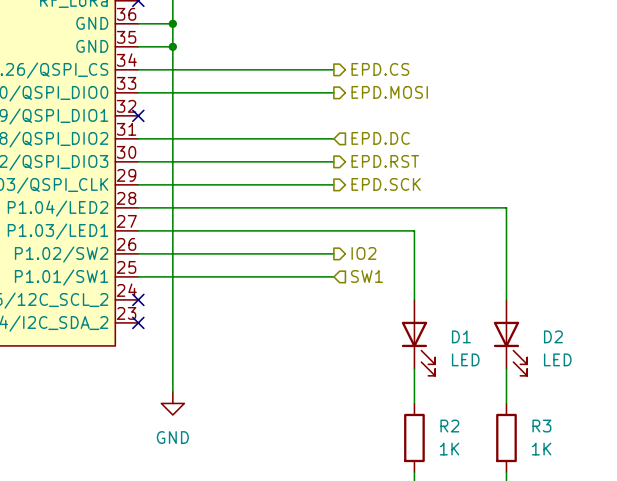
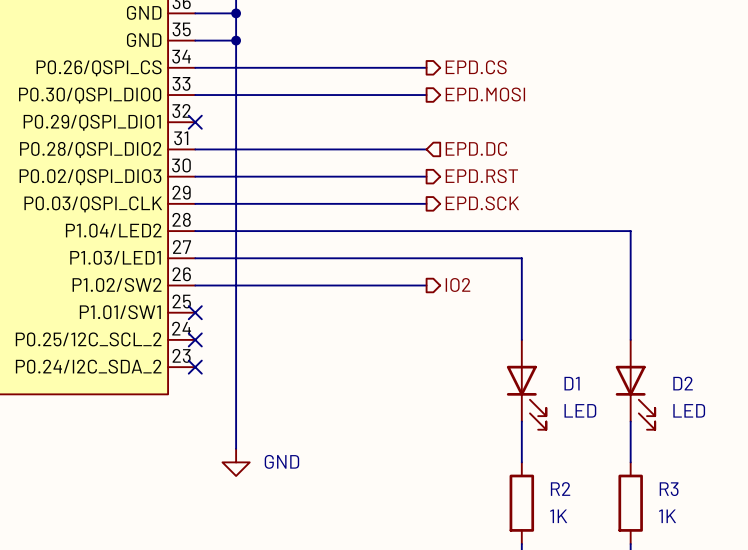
wire: (138, 276) (333, 276) -> none
no-connect mark: none -> (195, 312)
hierarchical label: SW1 (366, 276) -> none
power symbol text position: GND (172, 437) -> GND (281, 461)

